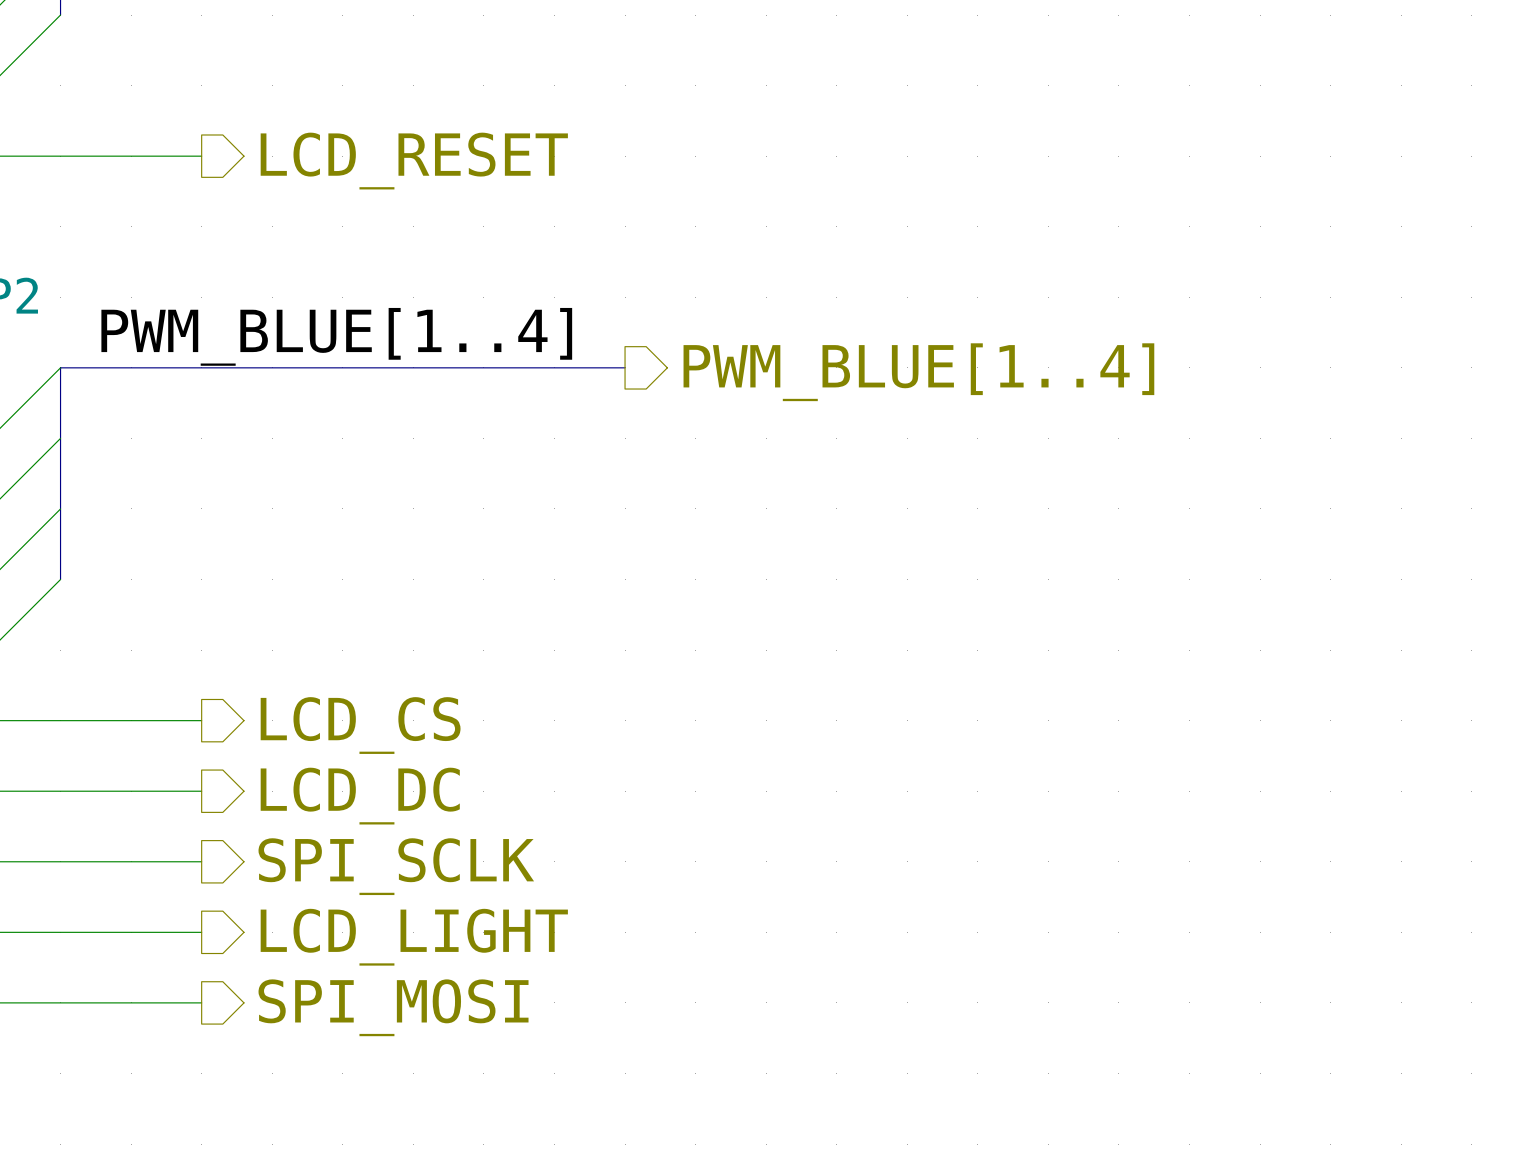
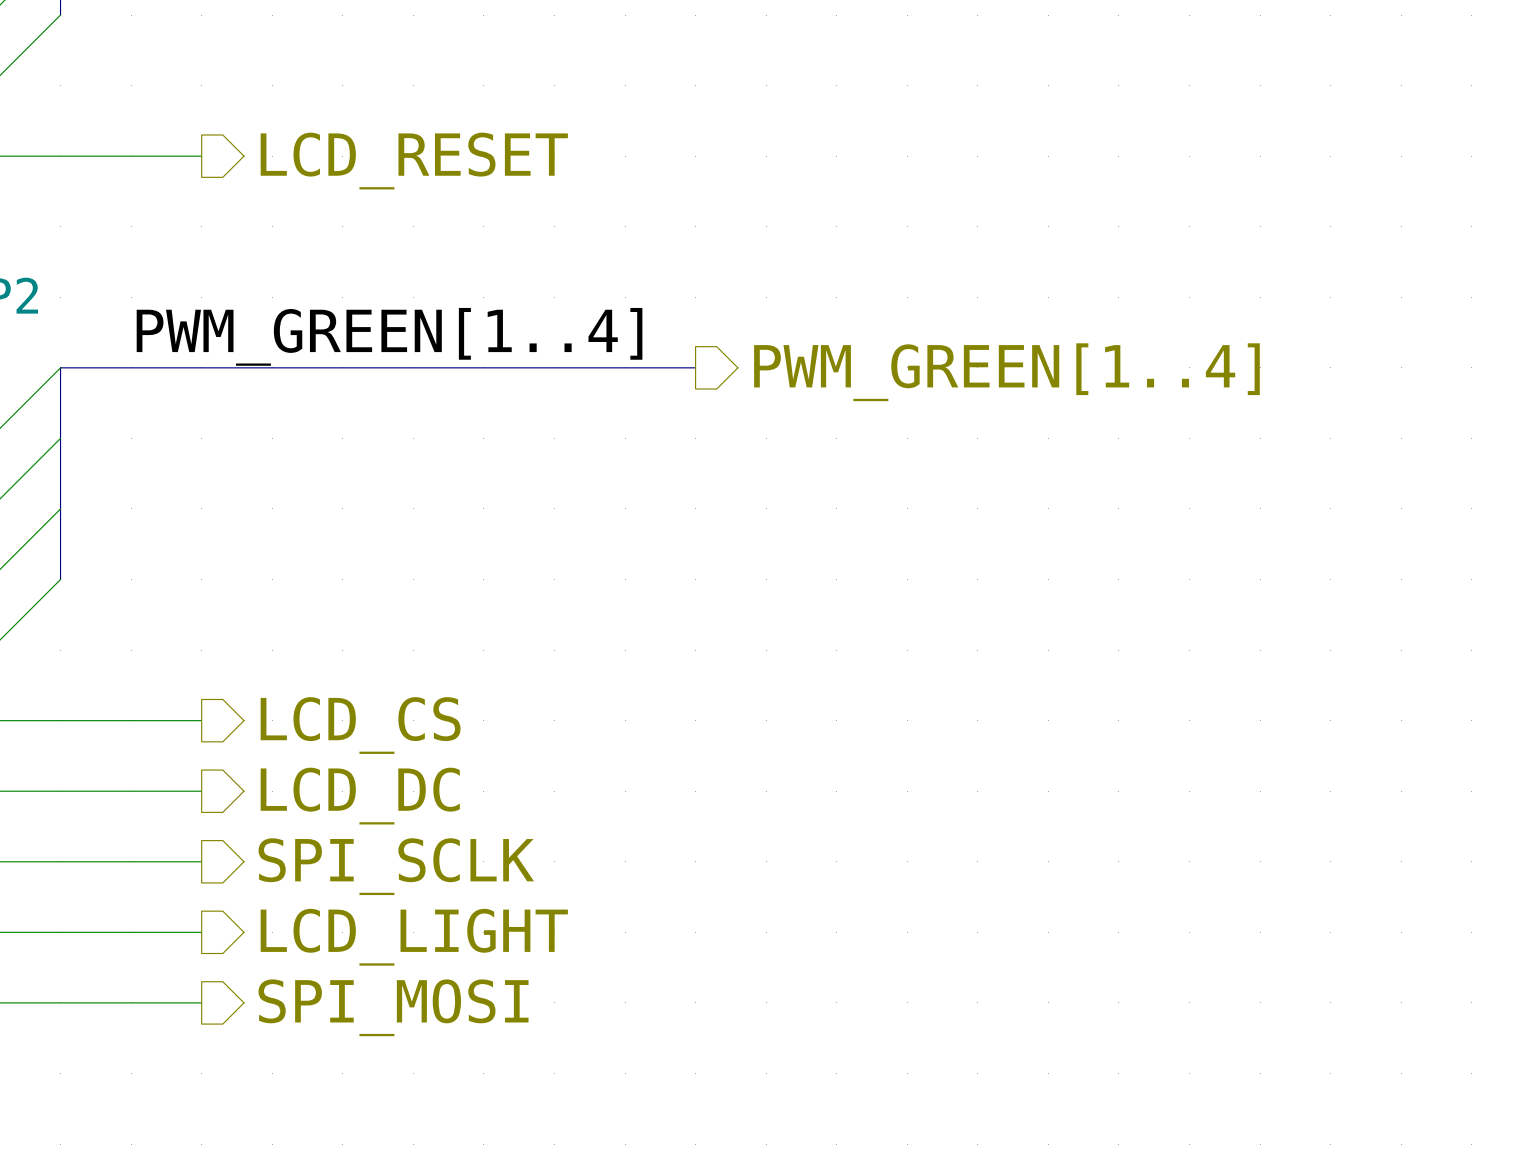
label: PWM_BLUE[1..4] (336, 336) -> PWM_GREEN[1..4] (389, 336)
bus: none -> (625, 367) (695, 367)
hierarchical label: PWM_BLUE[1..4] (918, 372) -> PWM_GREEN[1..4] (1006, 372)

